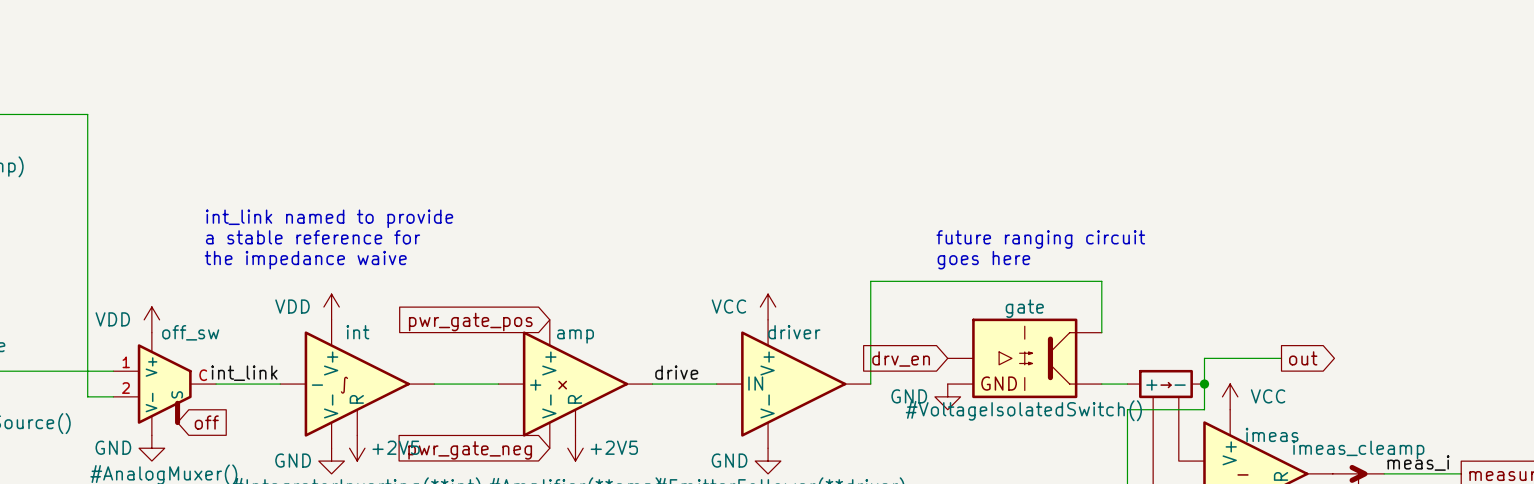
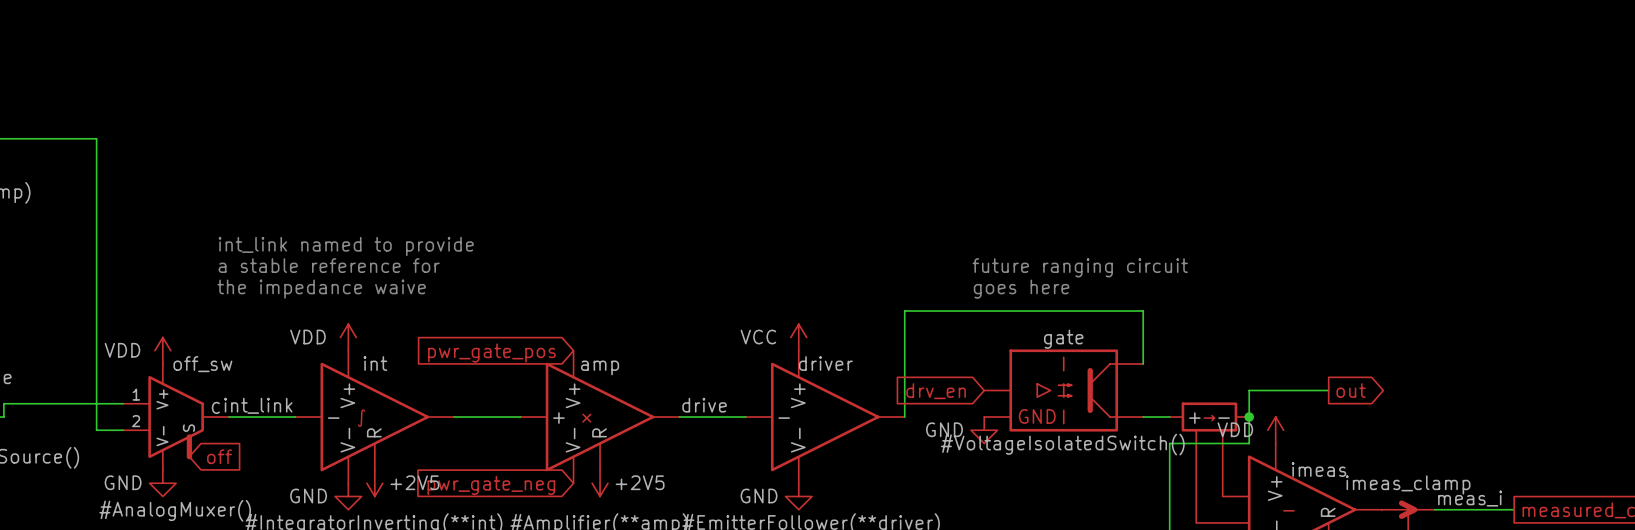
driver pin name: IN (755, 383) -> - (784, 418)
power symbol: VCC (1230, 396) -> VDD (1275, 430)
imeas_cleamp name: imeas_cleamp (1358, 449) -> imeas_clamp (1408, 484)

